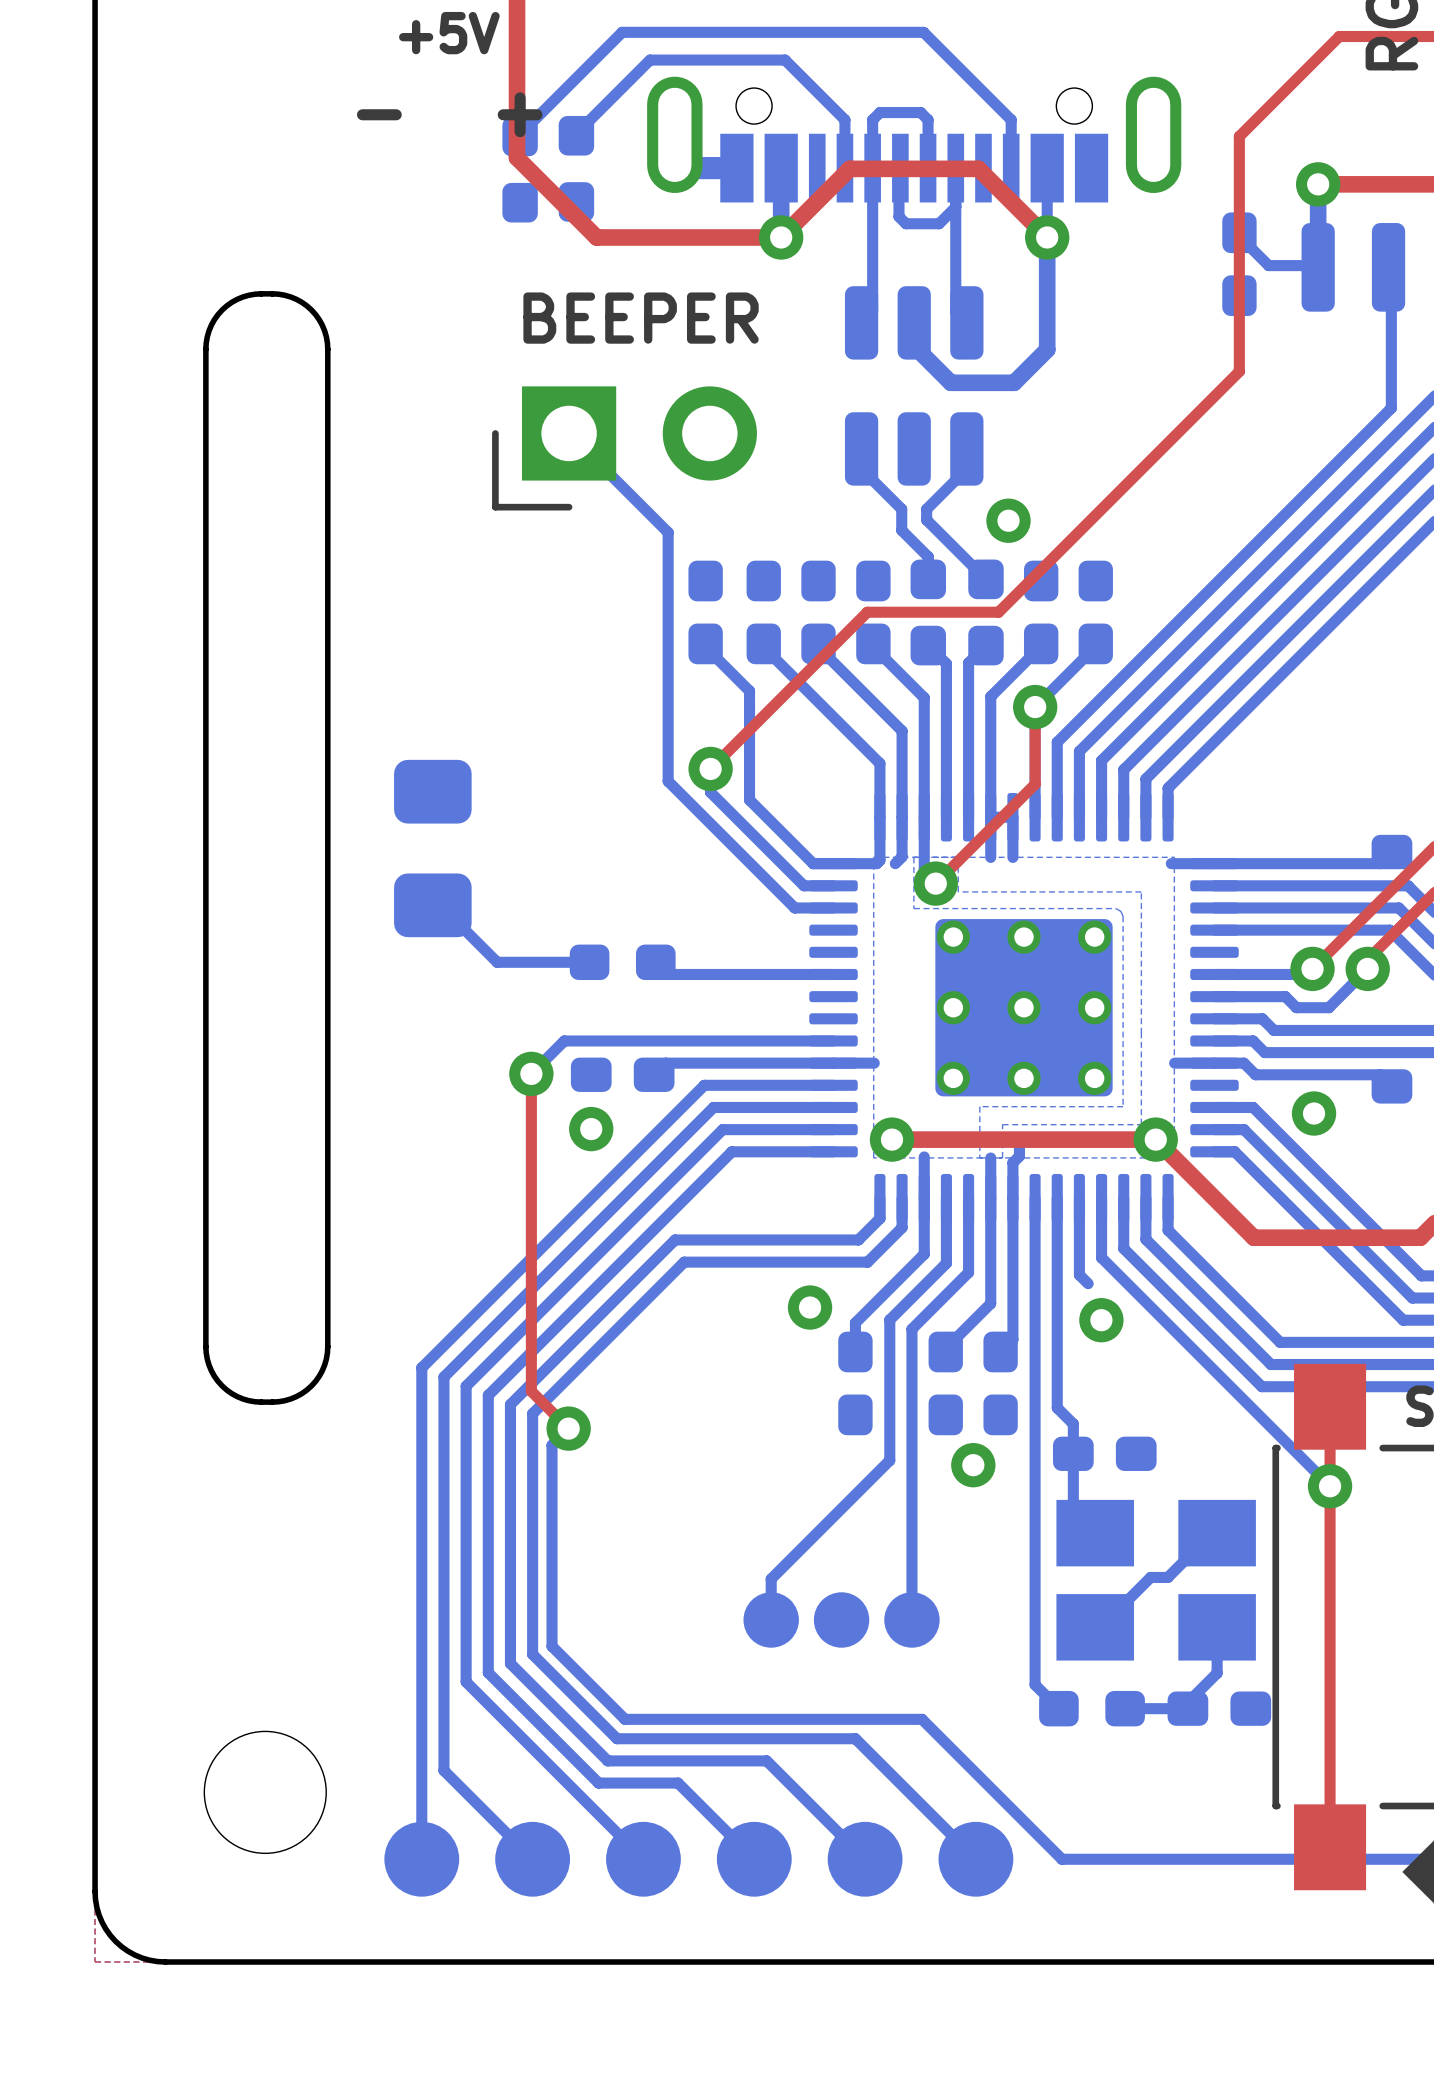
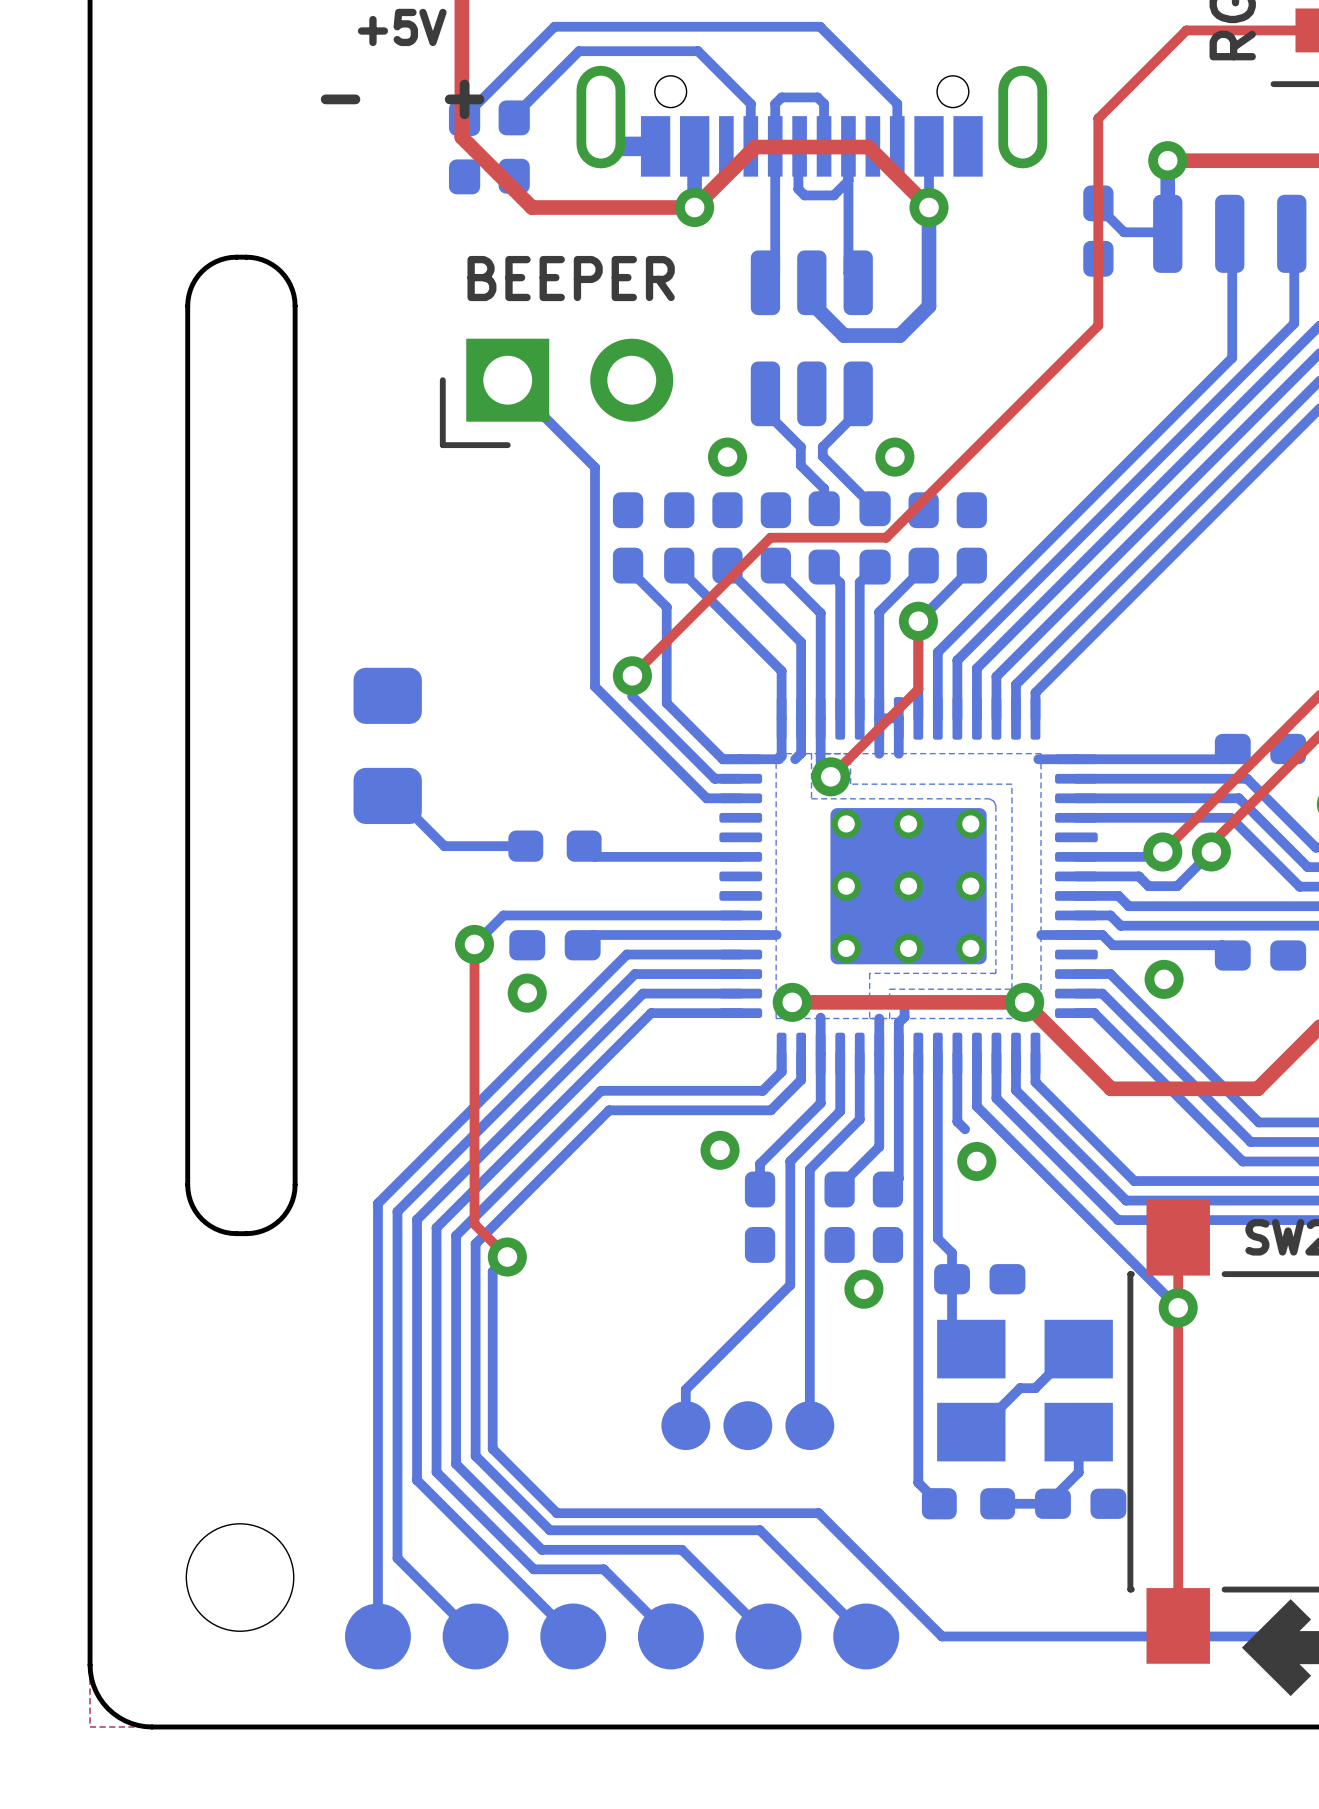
via: none -> (727, 457)

